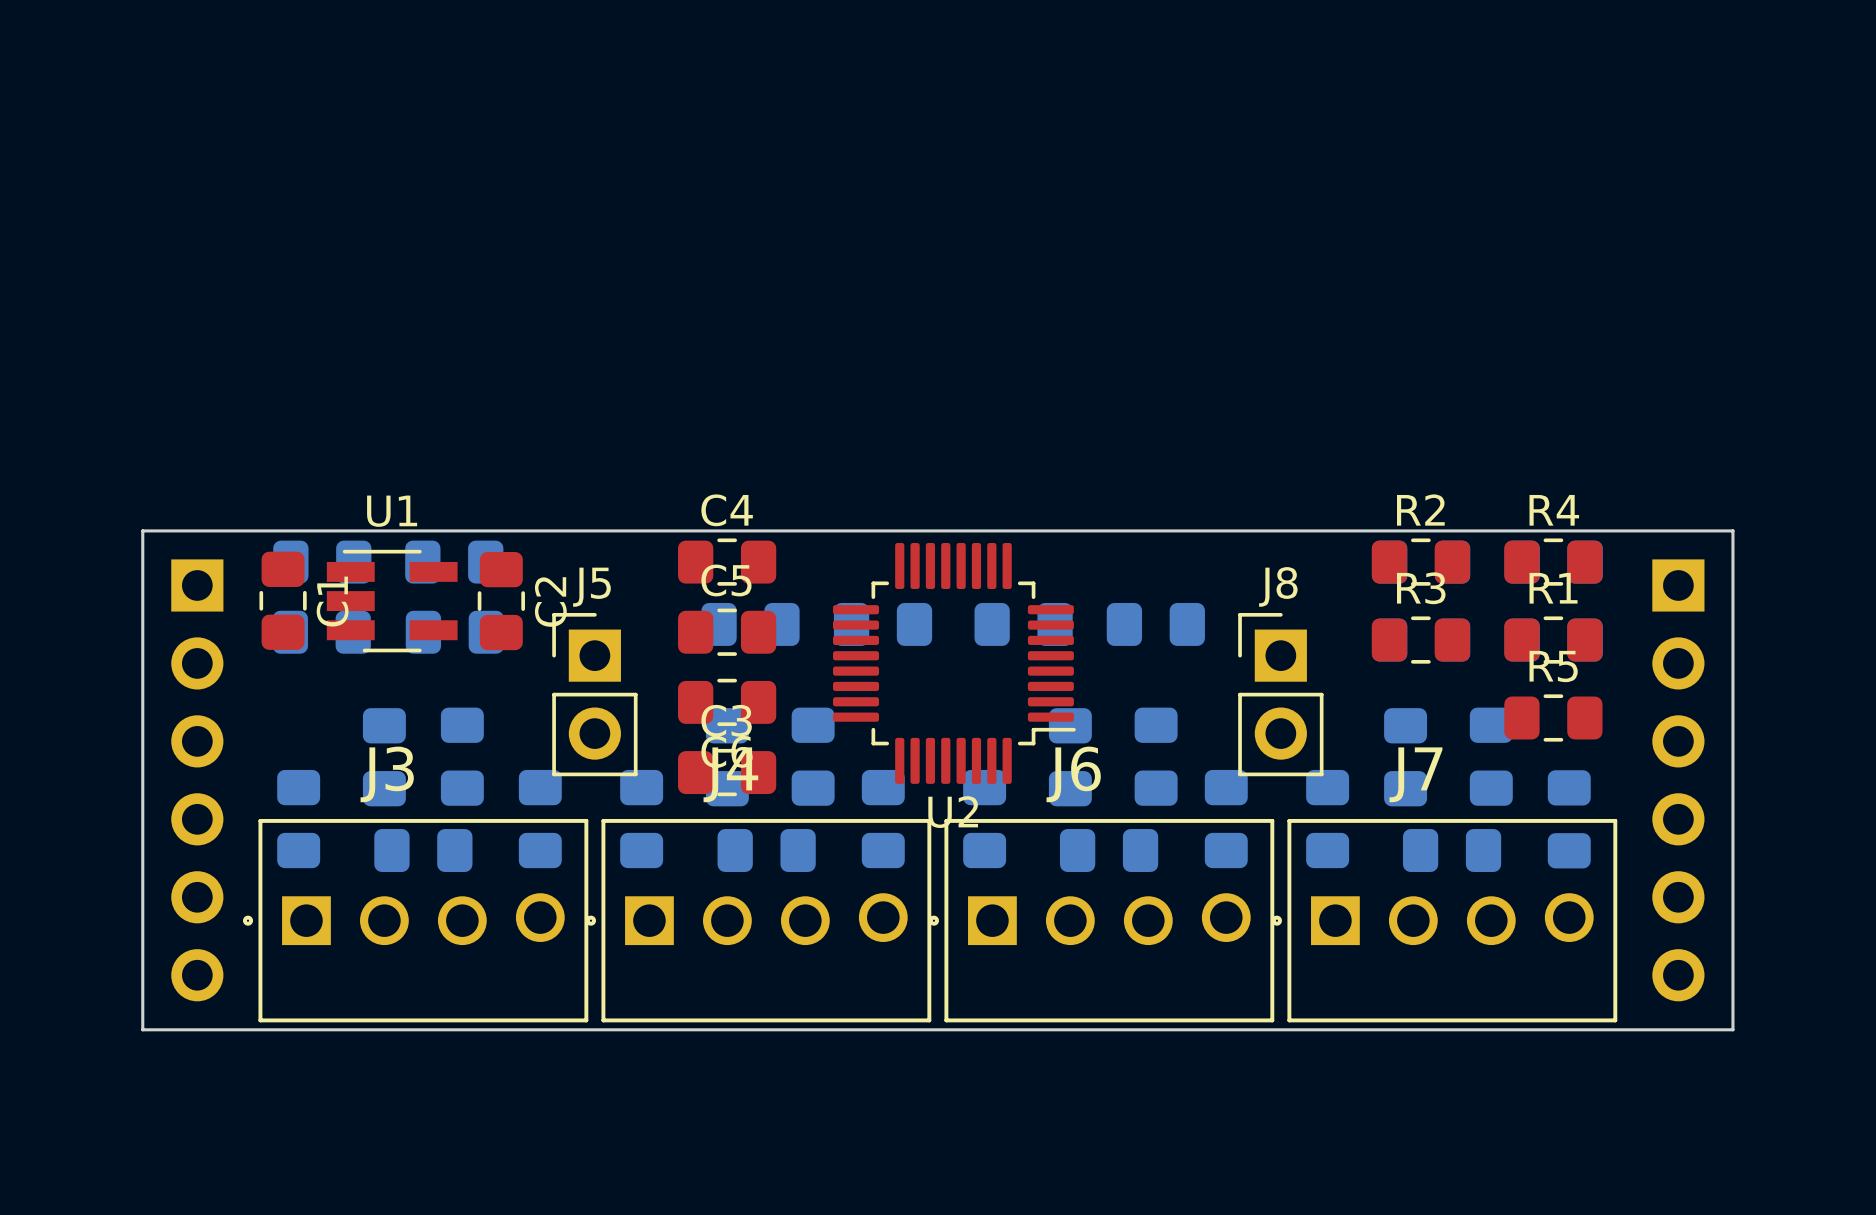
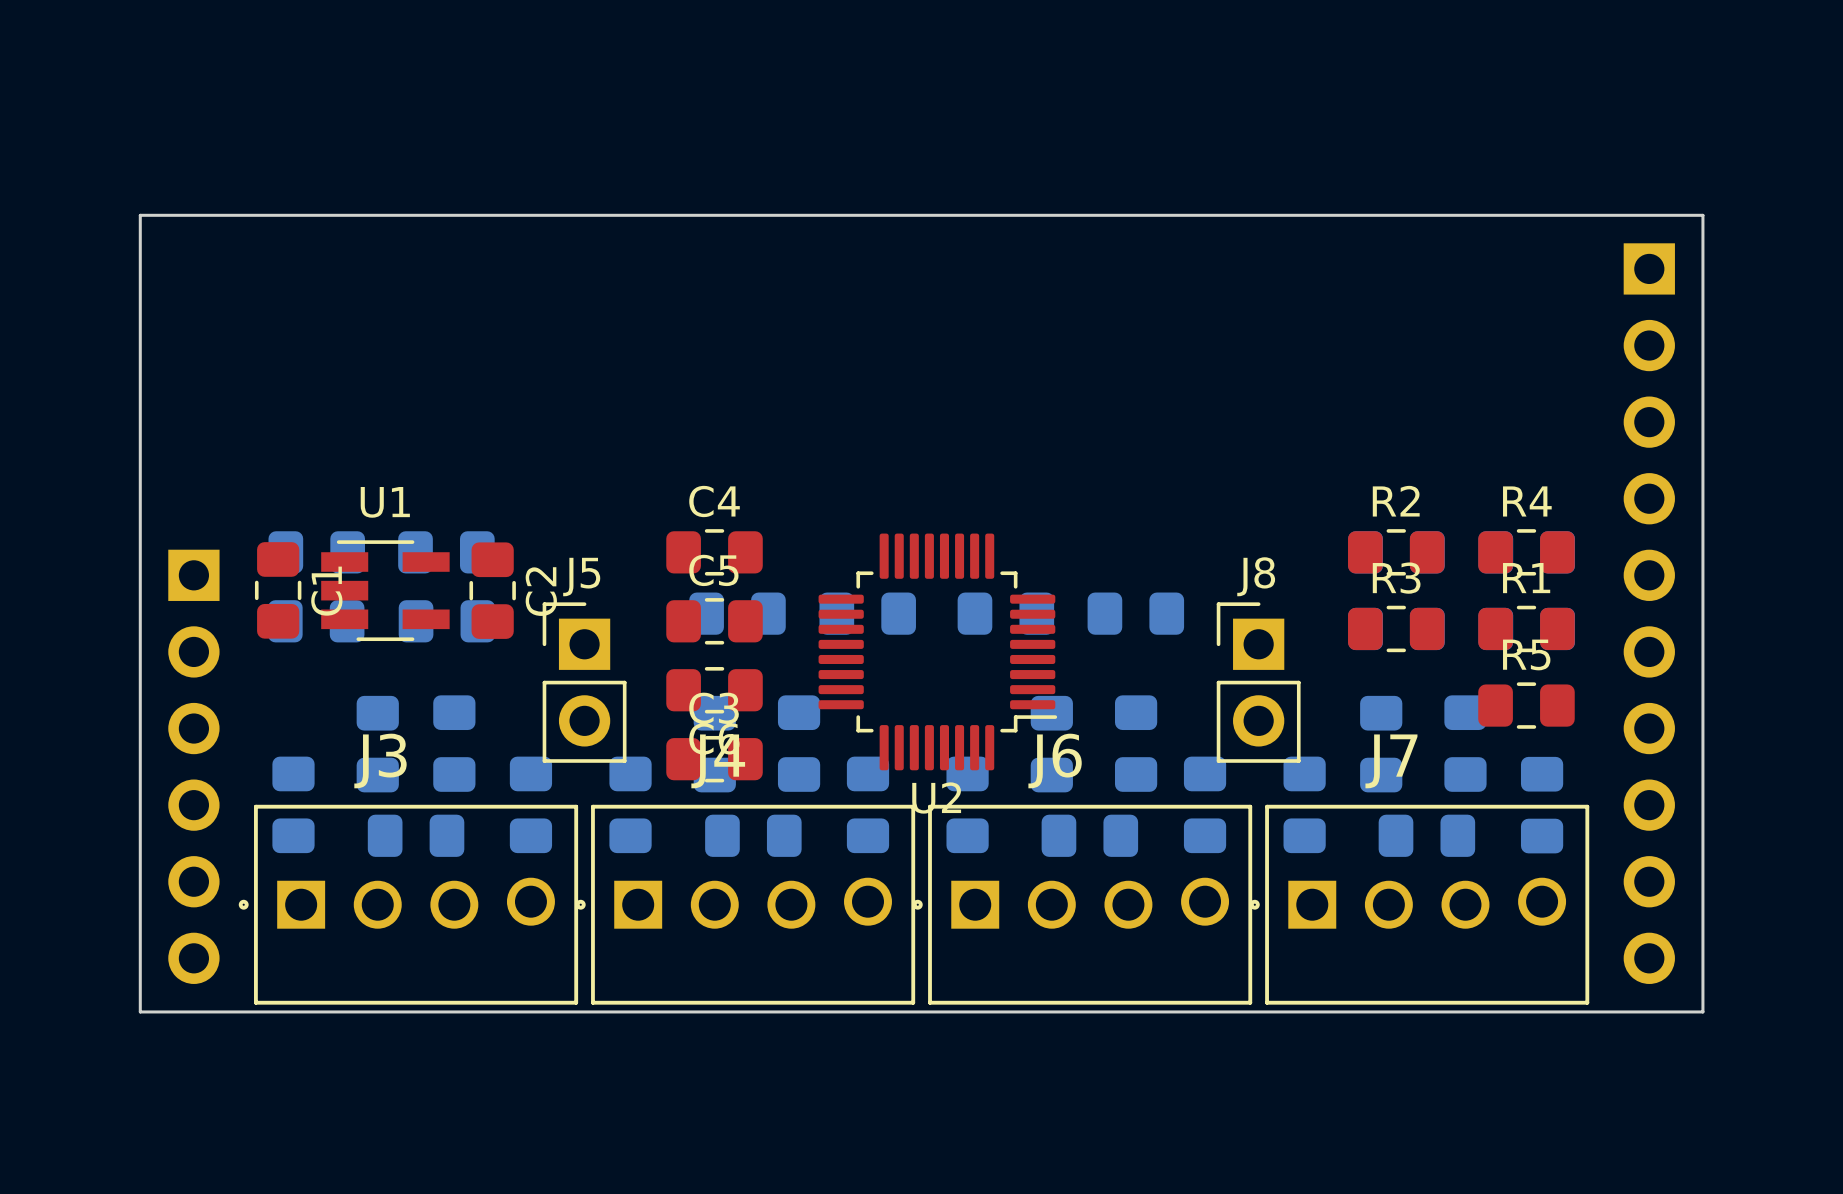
board edge: (142, 530) (1732, 530) -> (140, 521) (140, 215) (1702, 215) (1702, 521)
part: none -> (1649, 613)
part: (1678, 780) -> none

